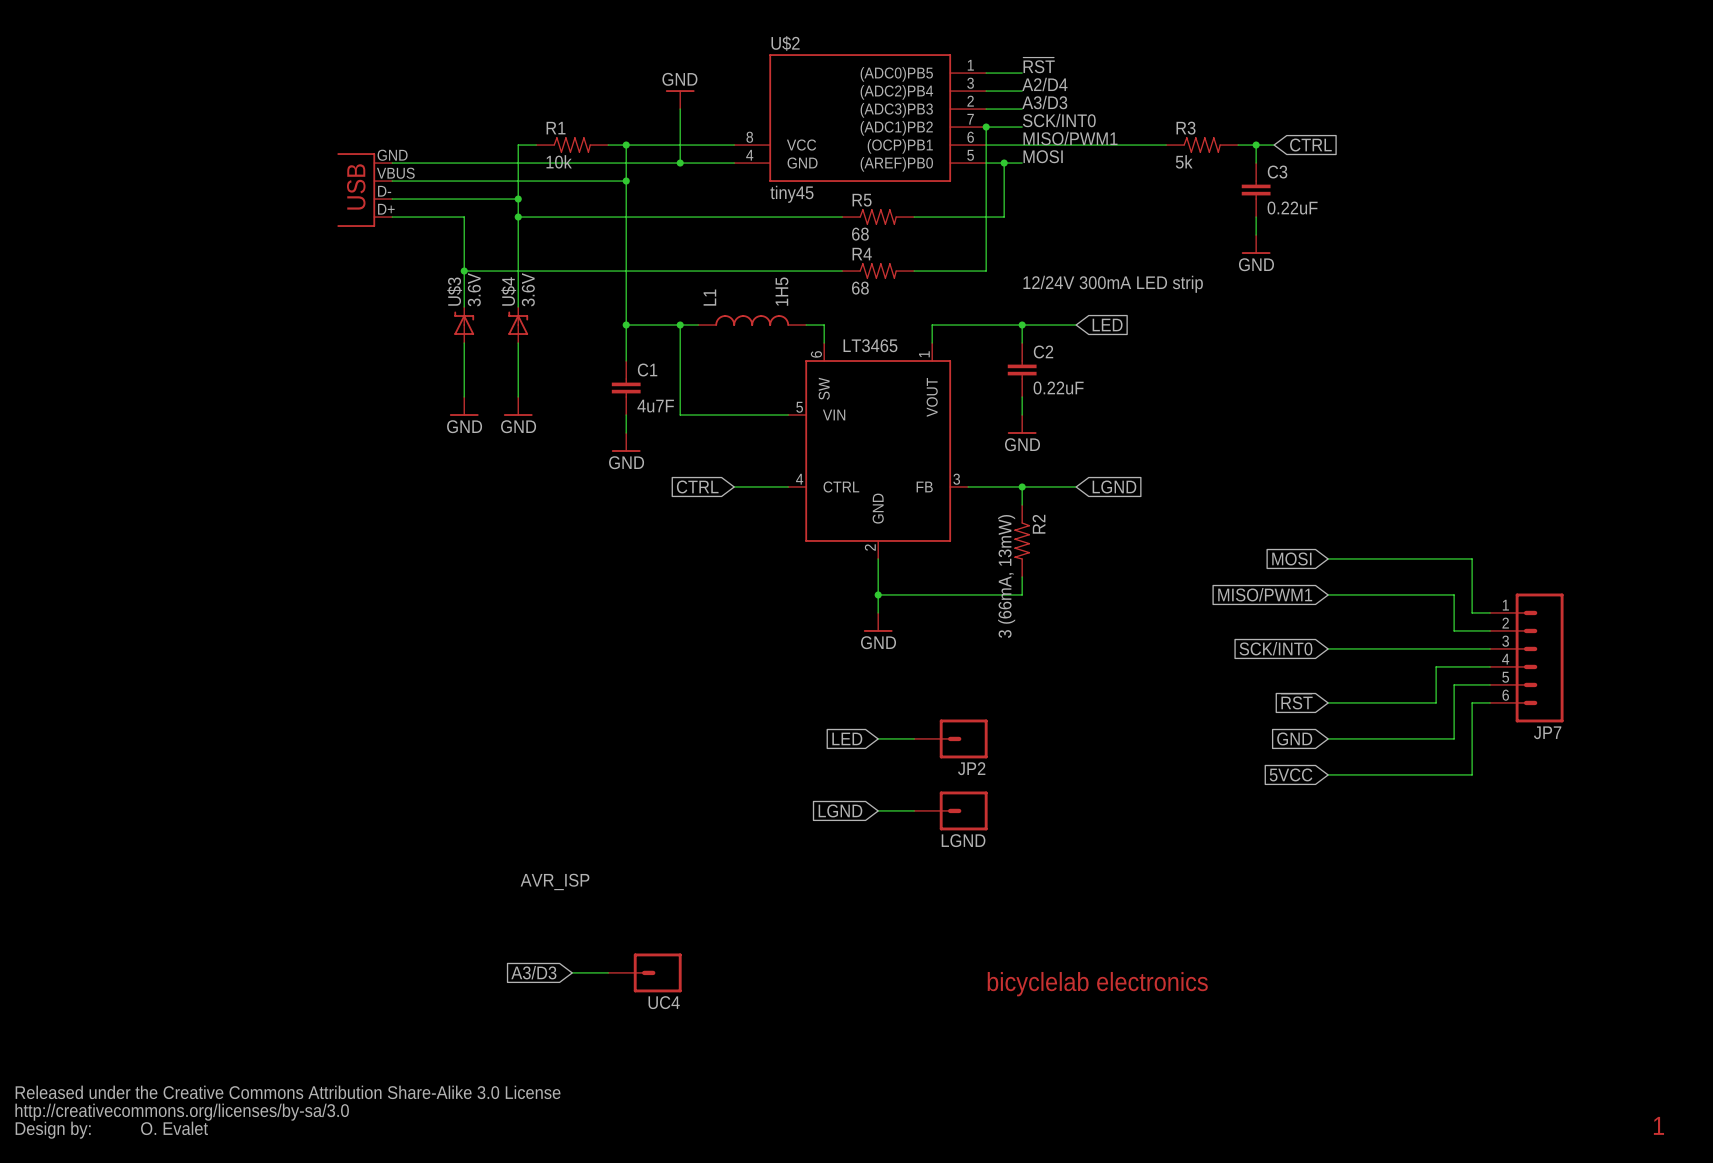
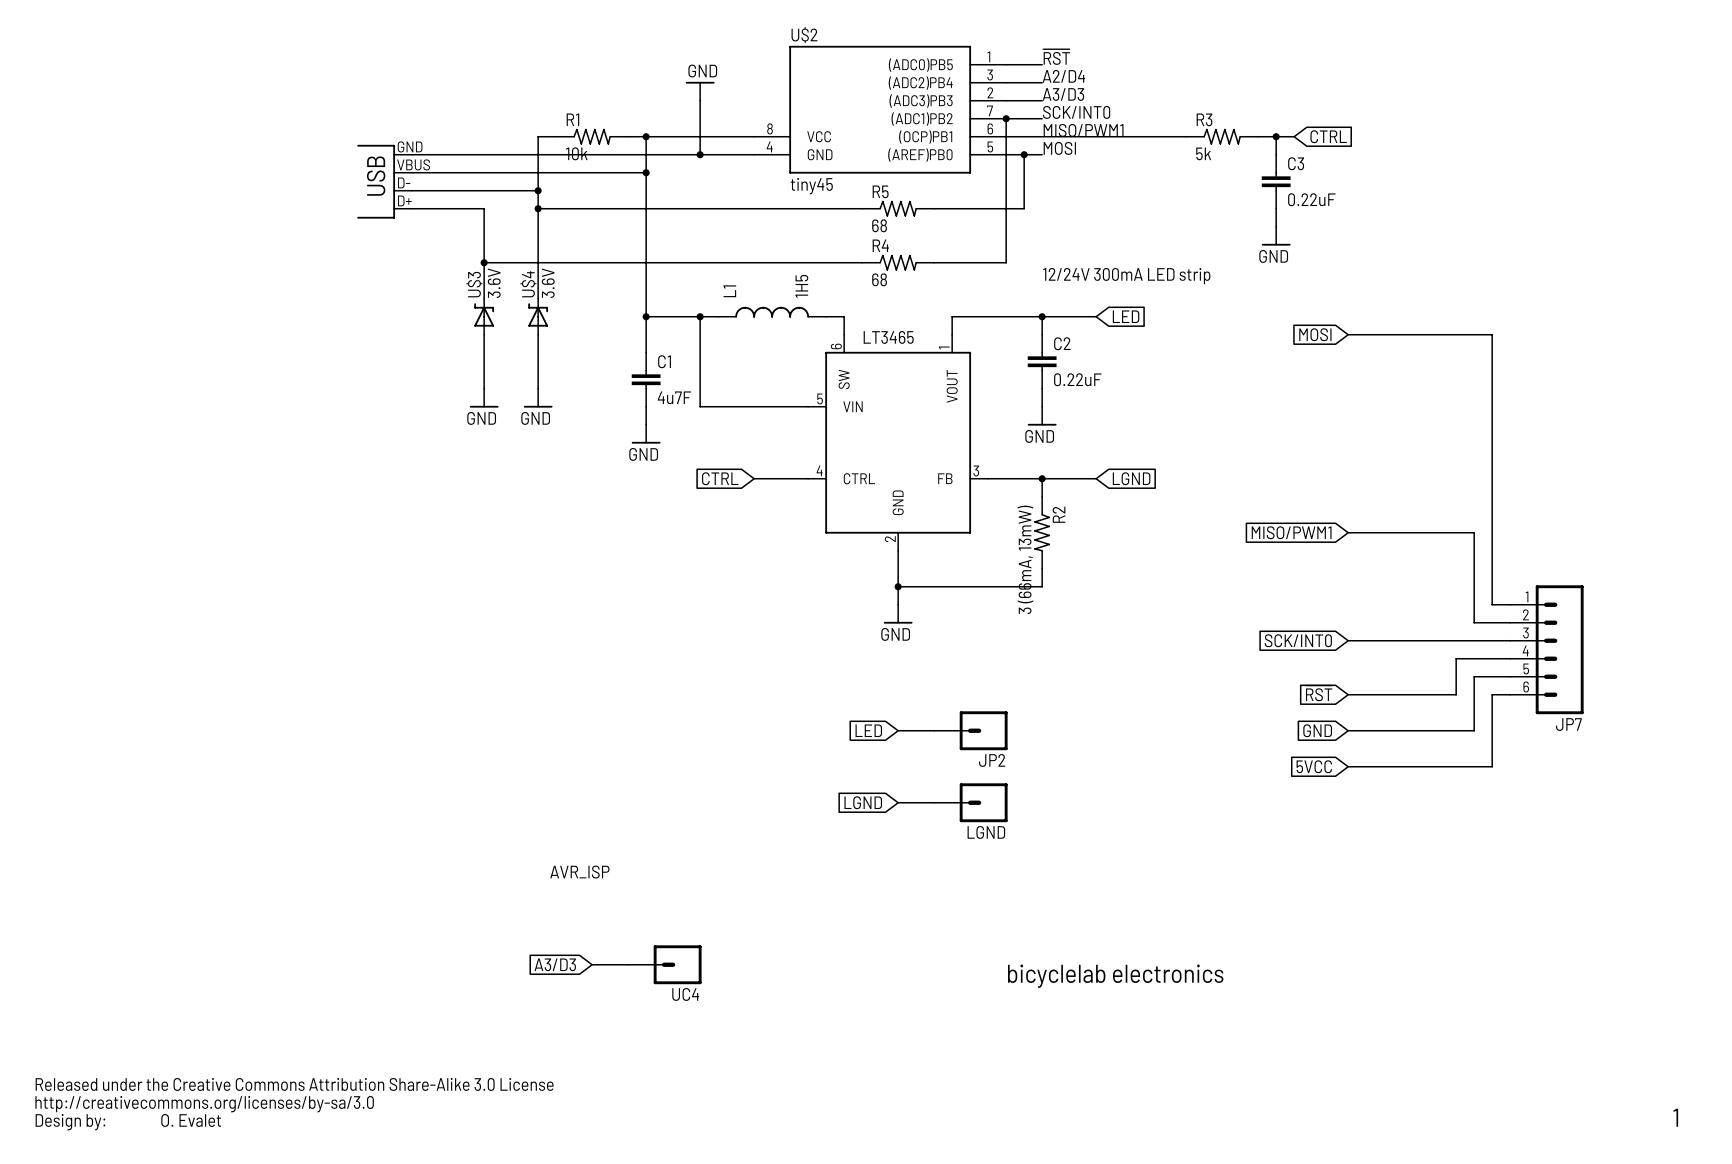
global label: none -> MOSI (1315, 334)
global label: MOSI (1291, 558) -> none
wire: (1328, 558) (1472, 558) -> (1348, 334) (1492, 334) (1492, 550)
global label position: MISO/PWM1 (1265, 594) -> MISO/PWM1 (1291, 532)
wire: (1328, 594) (1454, 594) -> (1348, 532) (1474, 532) (1474, 586)

